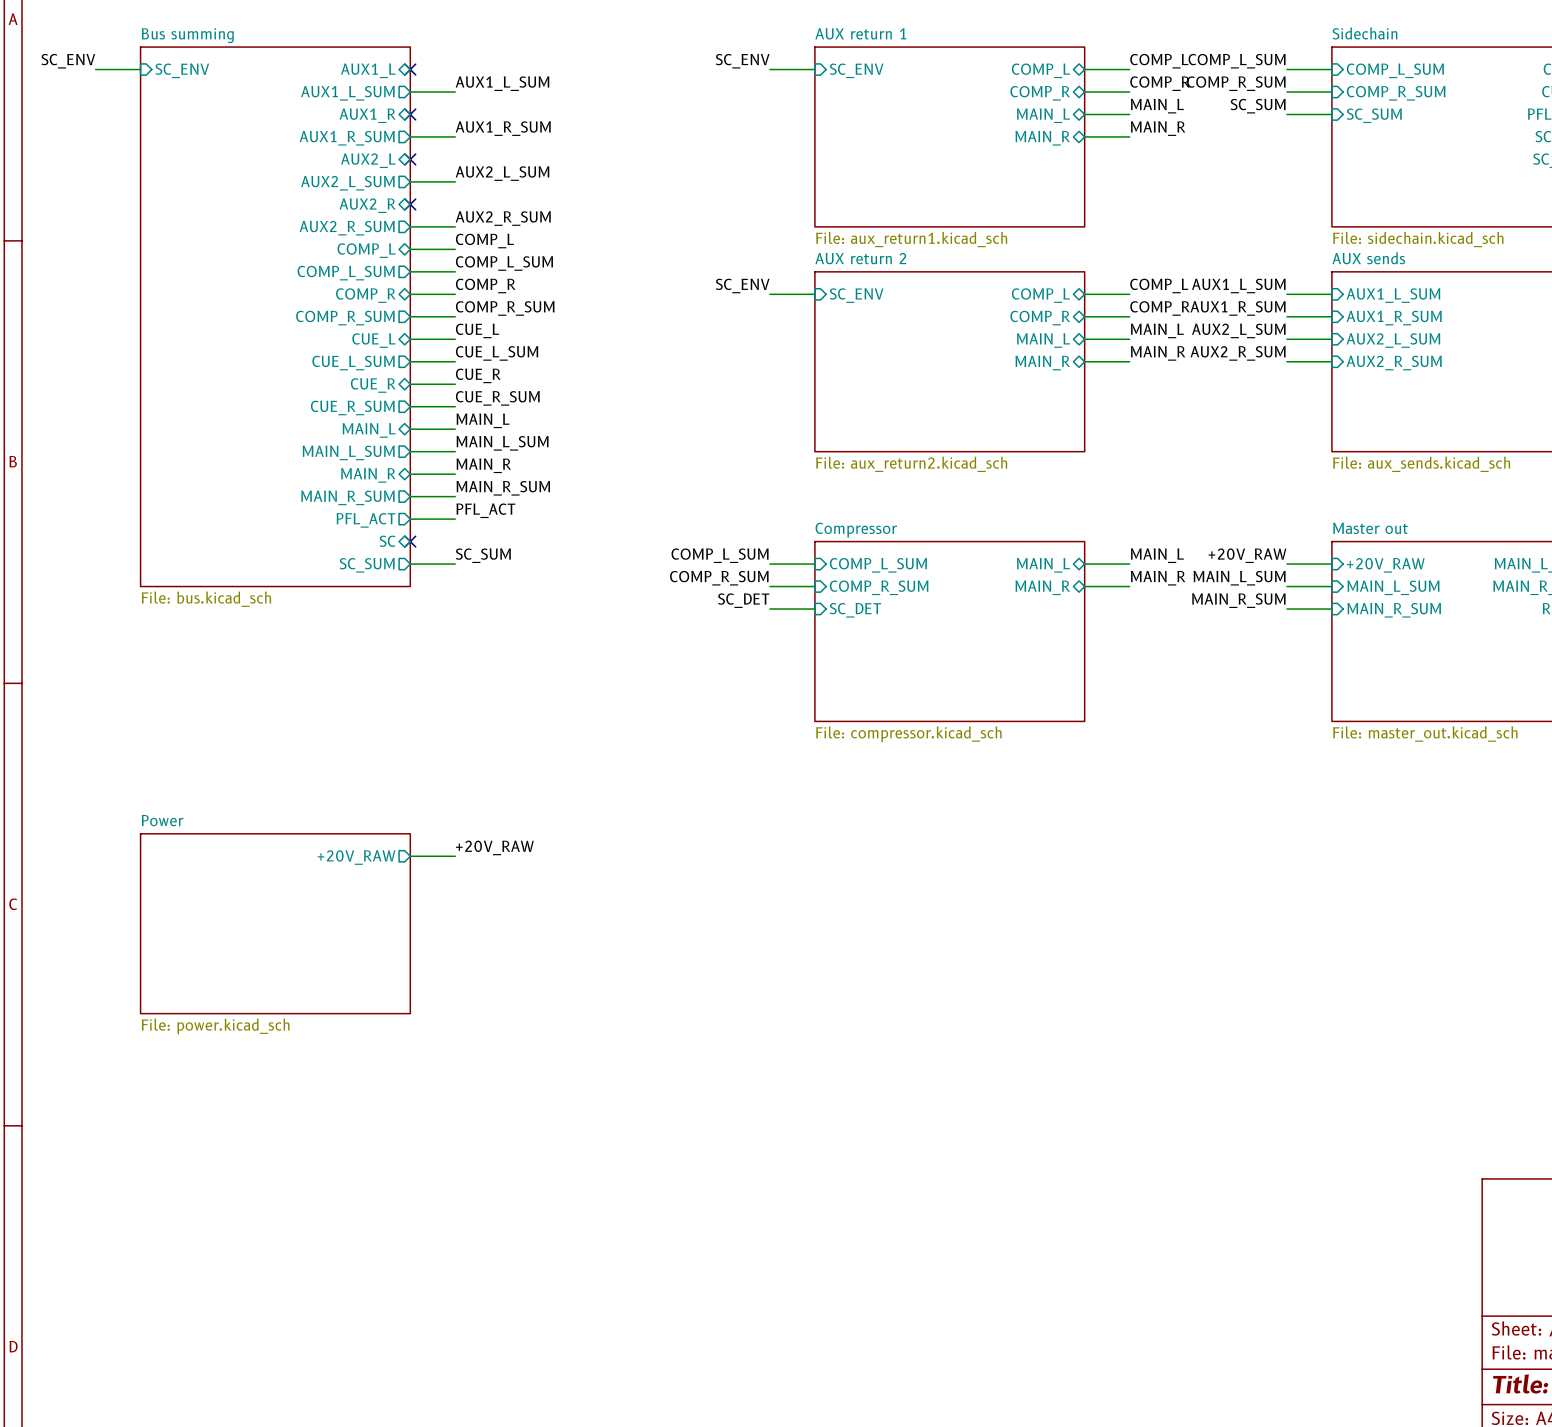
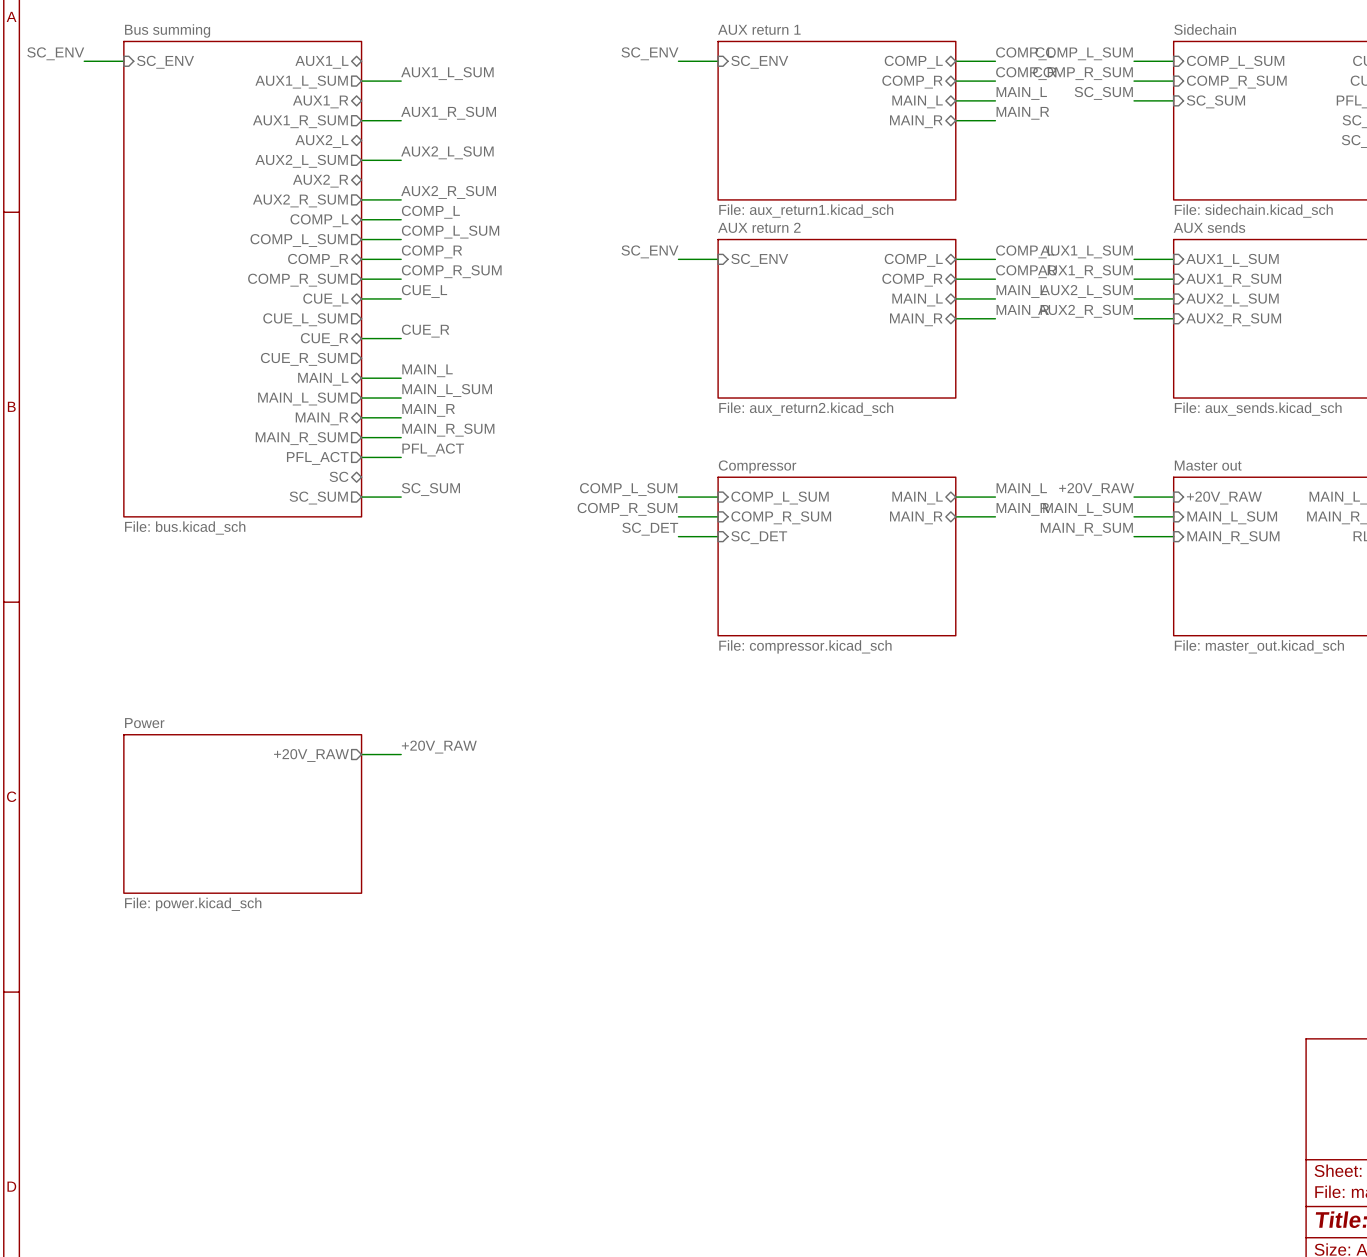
no-connect mark: (410, 69) -> none
no-connect mark: (410, 114) -> none
no-connect mark: (410, 159) -> none
no-connect mark: (410, 204) -> none
label: CUE_L_SUM (497, 353) -> none
wire: (410, 361) (455, 361) -> none
label: CUE_R_SUM (497, 398) -> none
wire: (410, 406) (455, 406) -> none
no-connect mark: (410, 541) -> none

